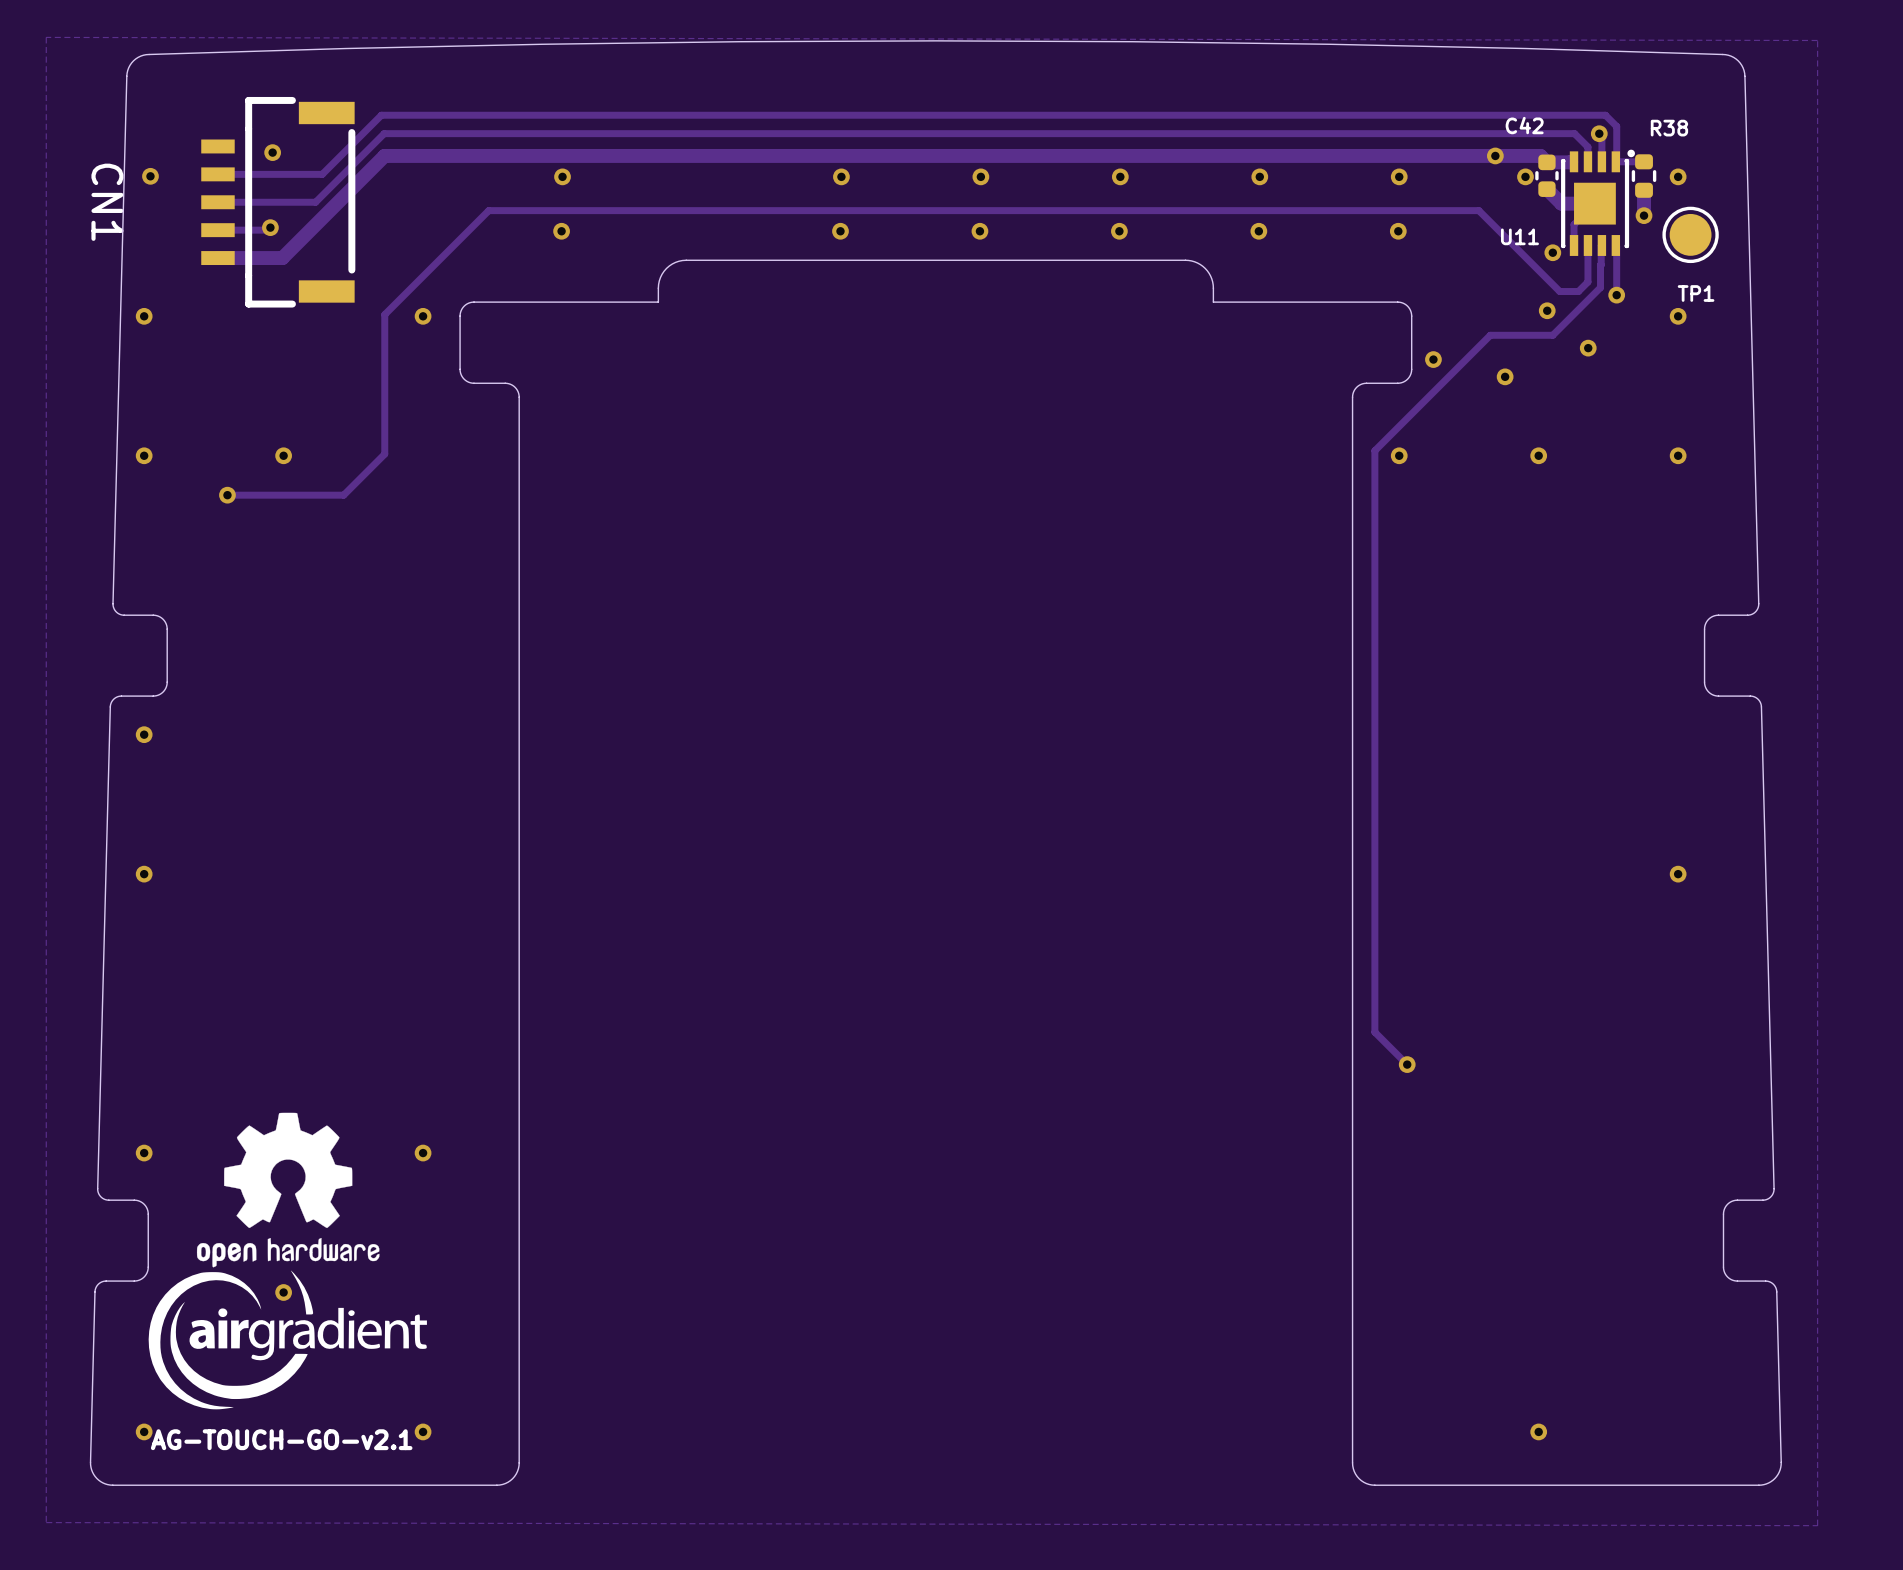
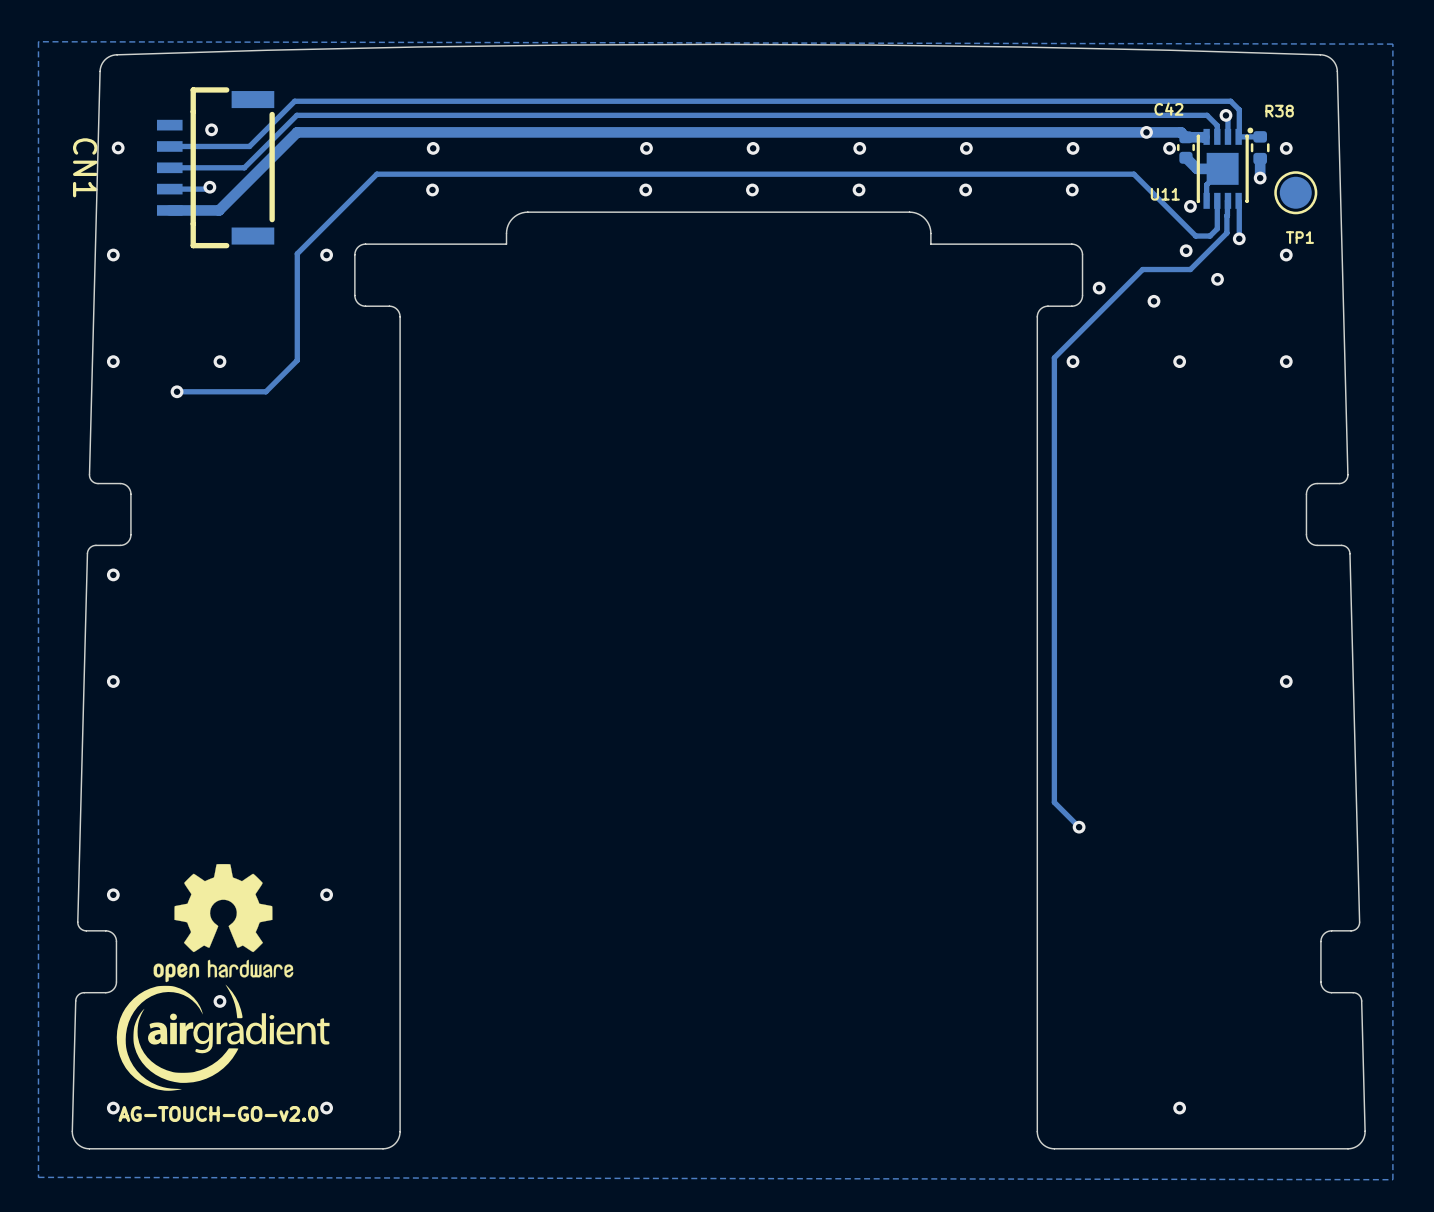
text: AG-TOUCH-GO-v2.1 (281, 1439) -> AG-TOUCH-GO-v2.0 (218, 1113)

